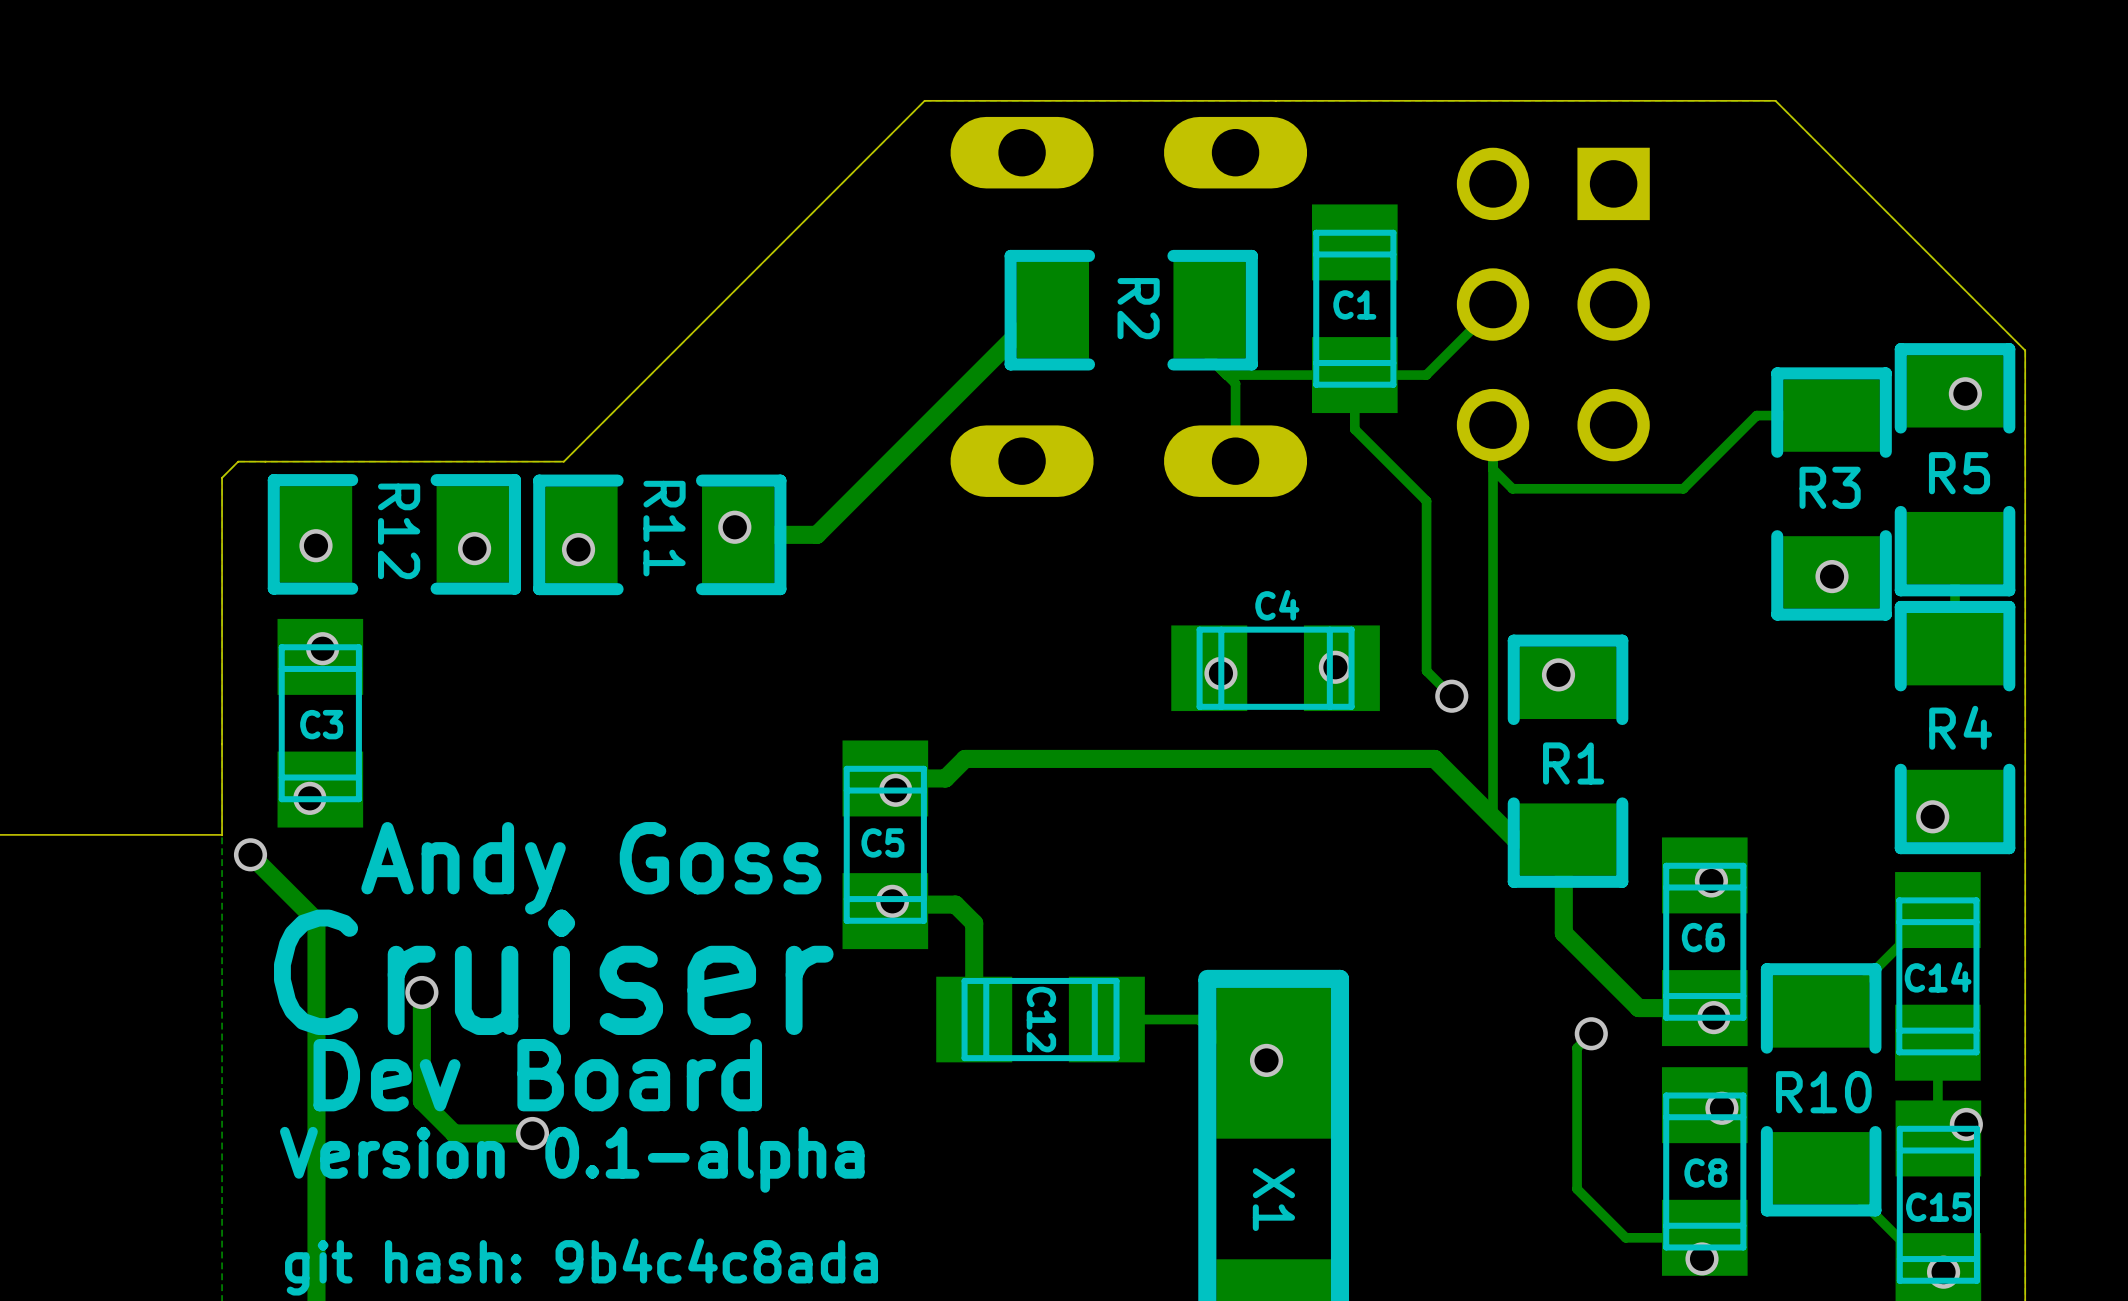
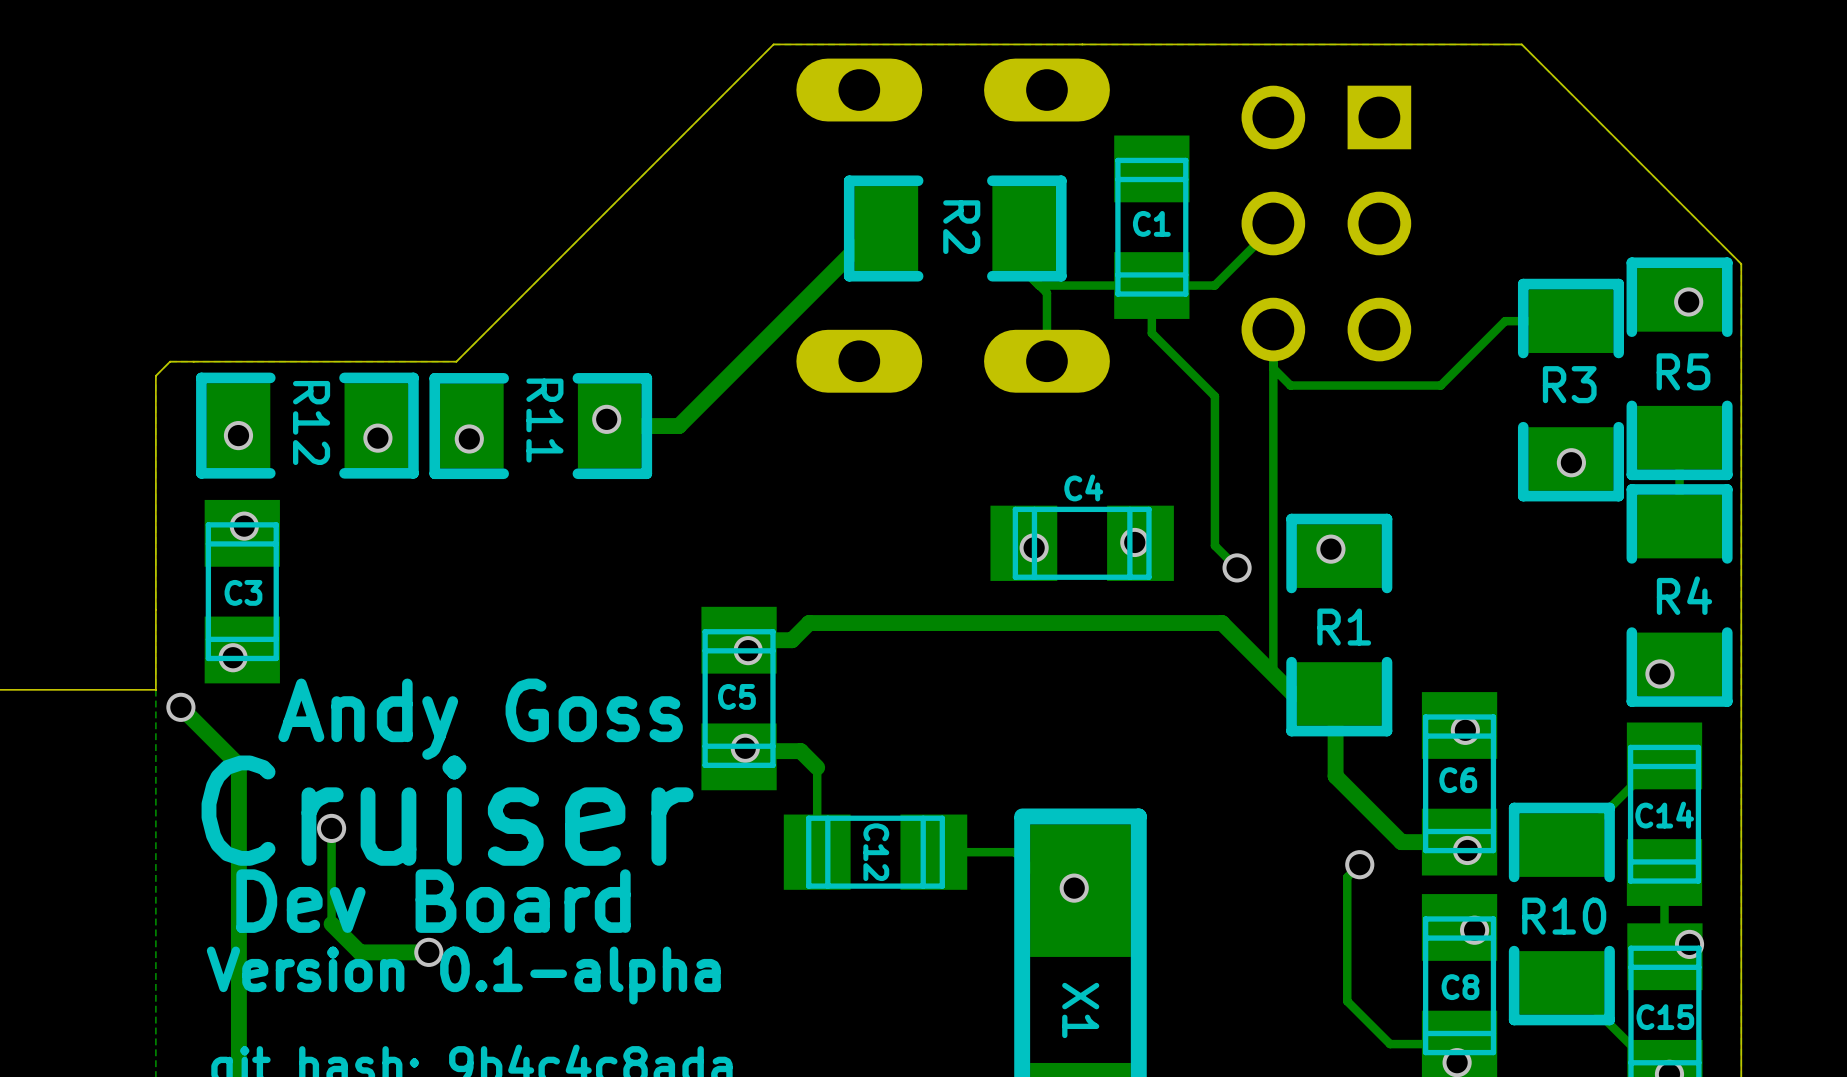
track width: thick (974, 923) (974, 1019) -> thin (817, 767) (817, 852)
track width: thick (421, 992) (421, 1101) -> thin (331, 828) (331, 923)

